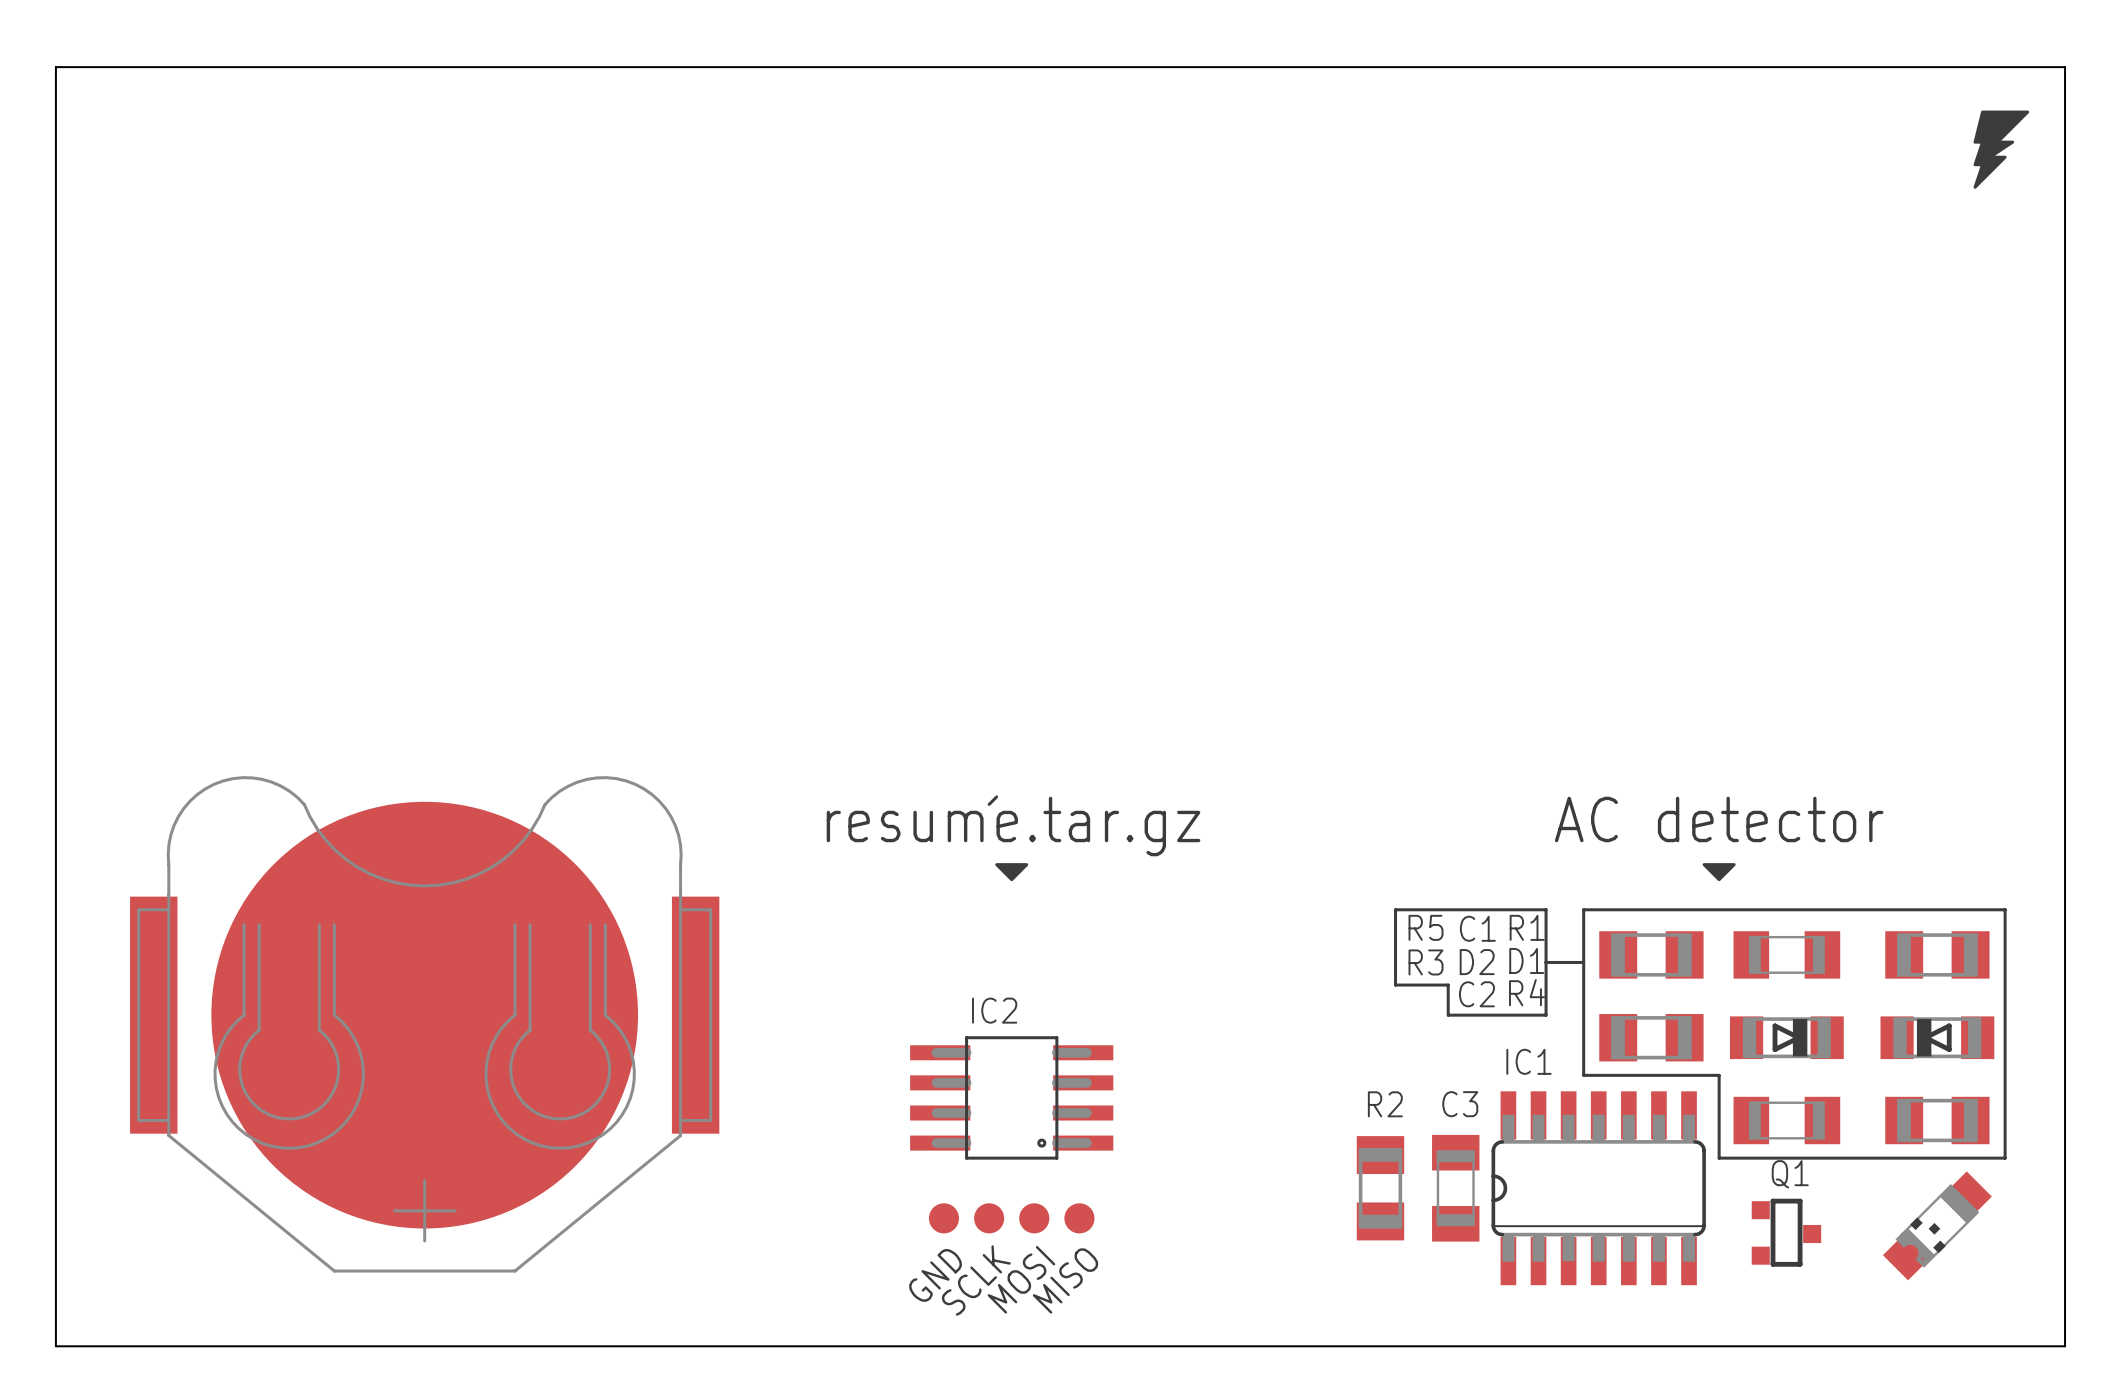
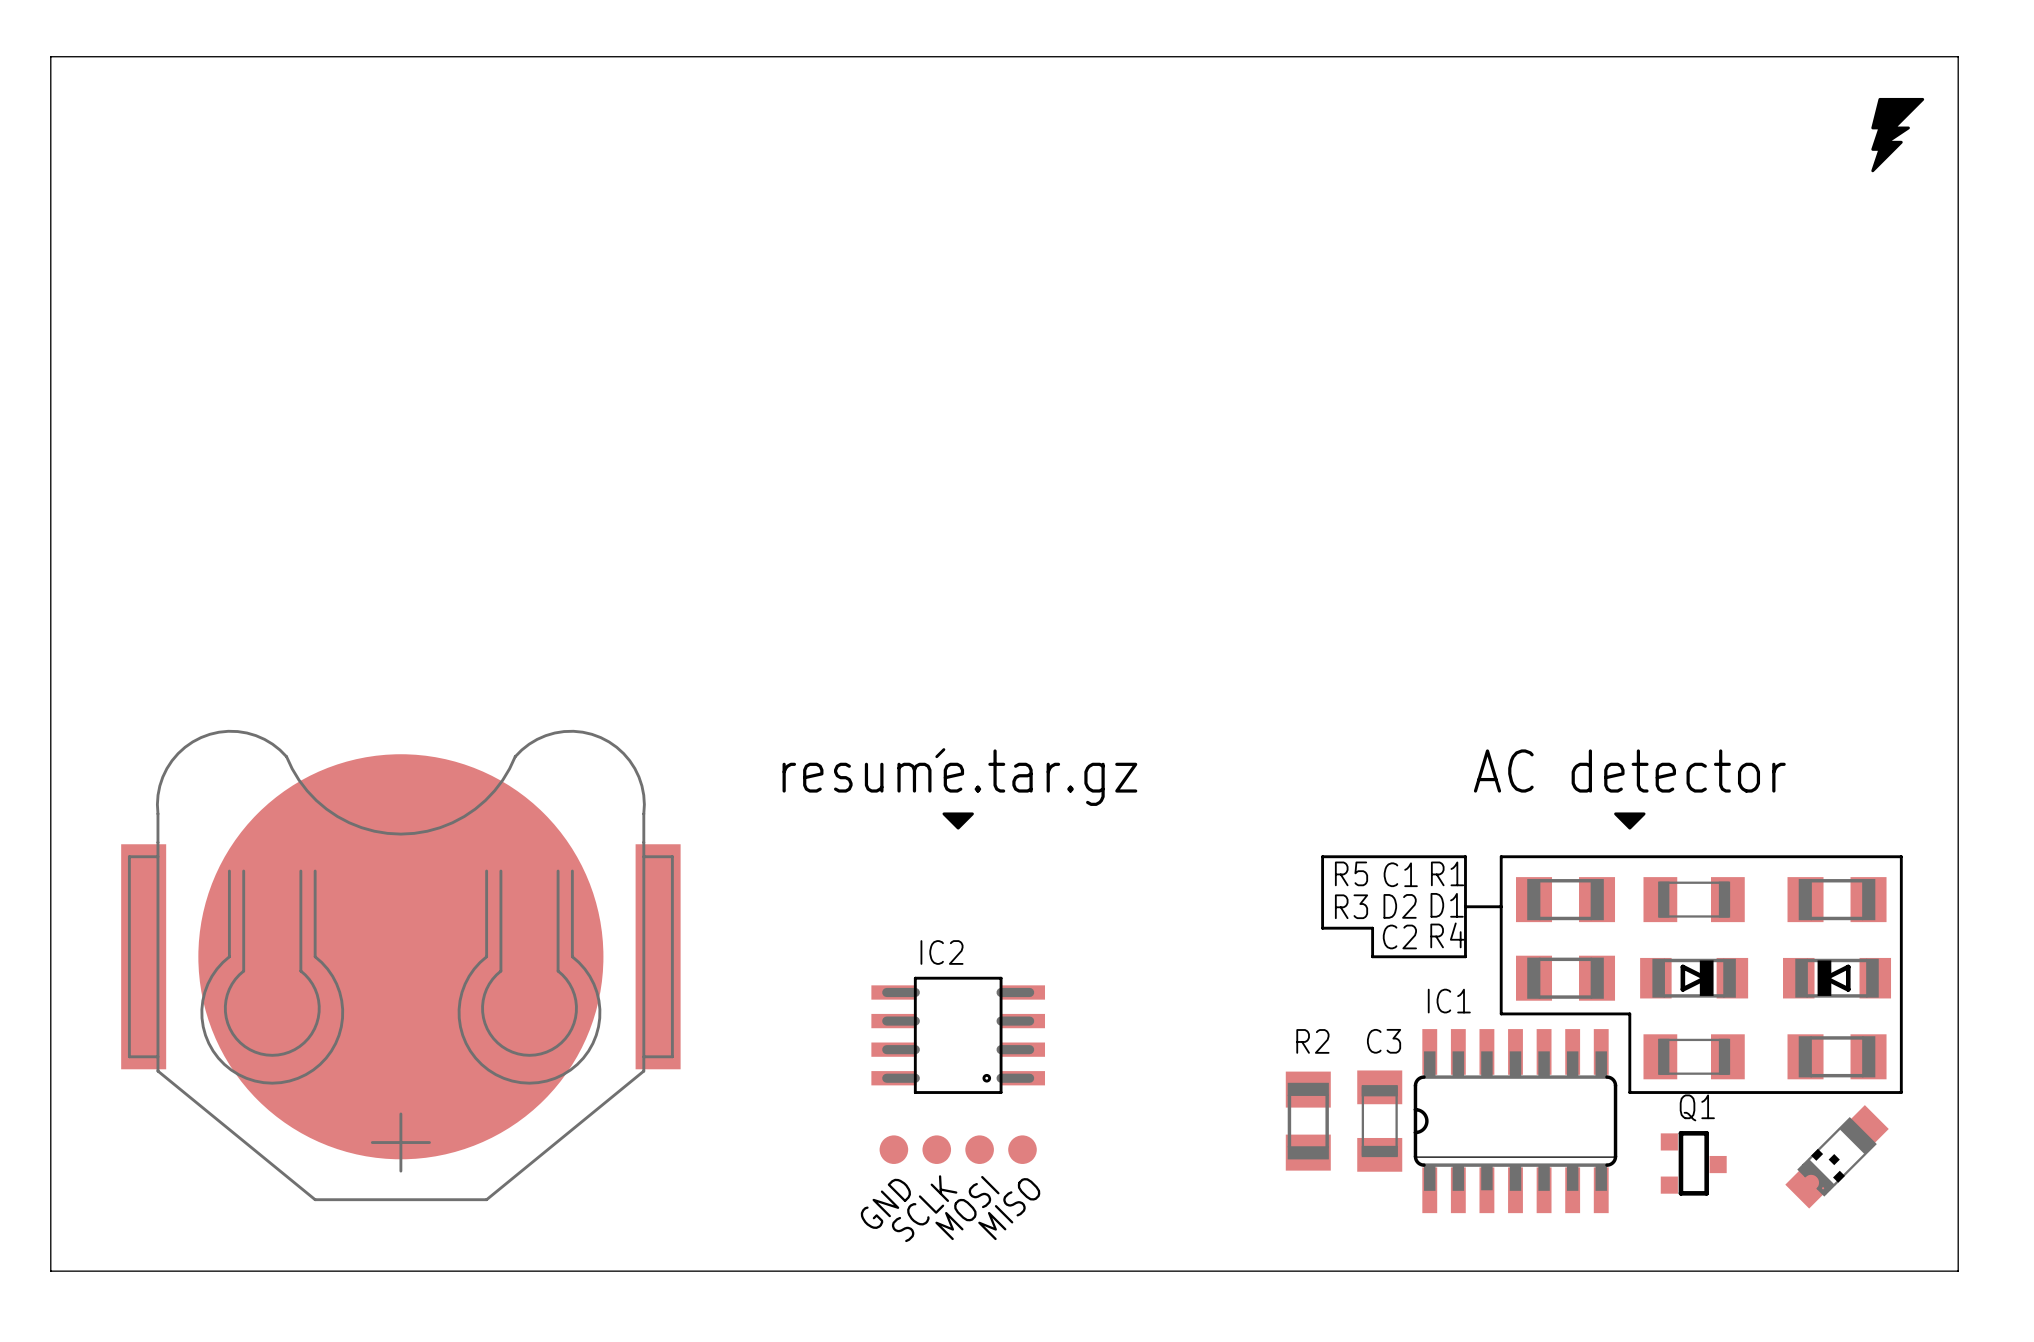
IC2 footprint: [910, 1036, 1114, 1160] -> [871, 976, 1046, 1094]

